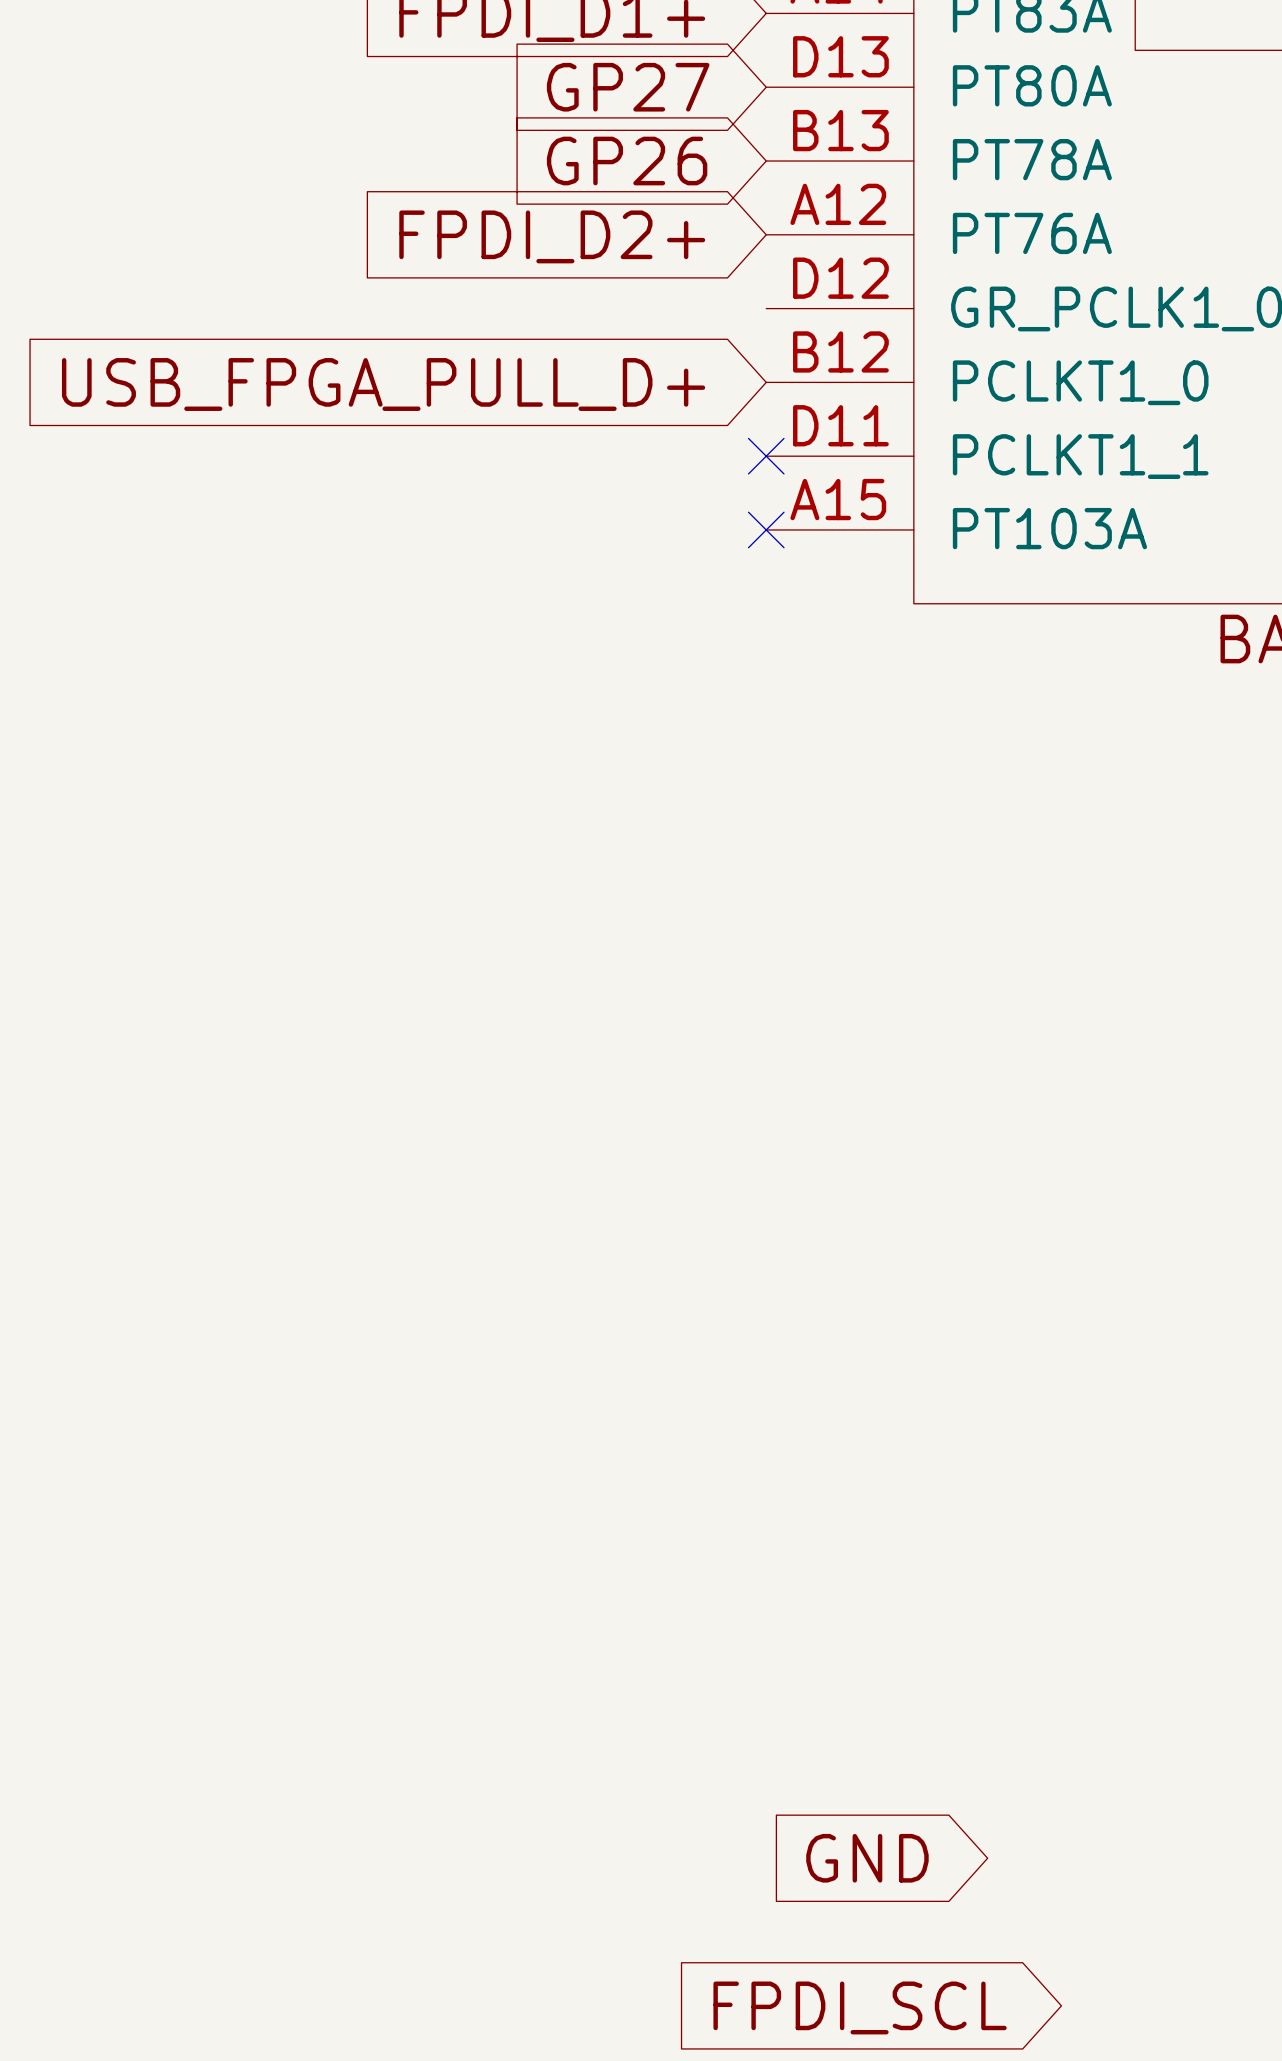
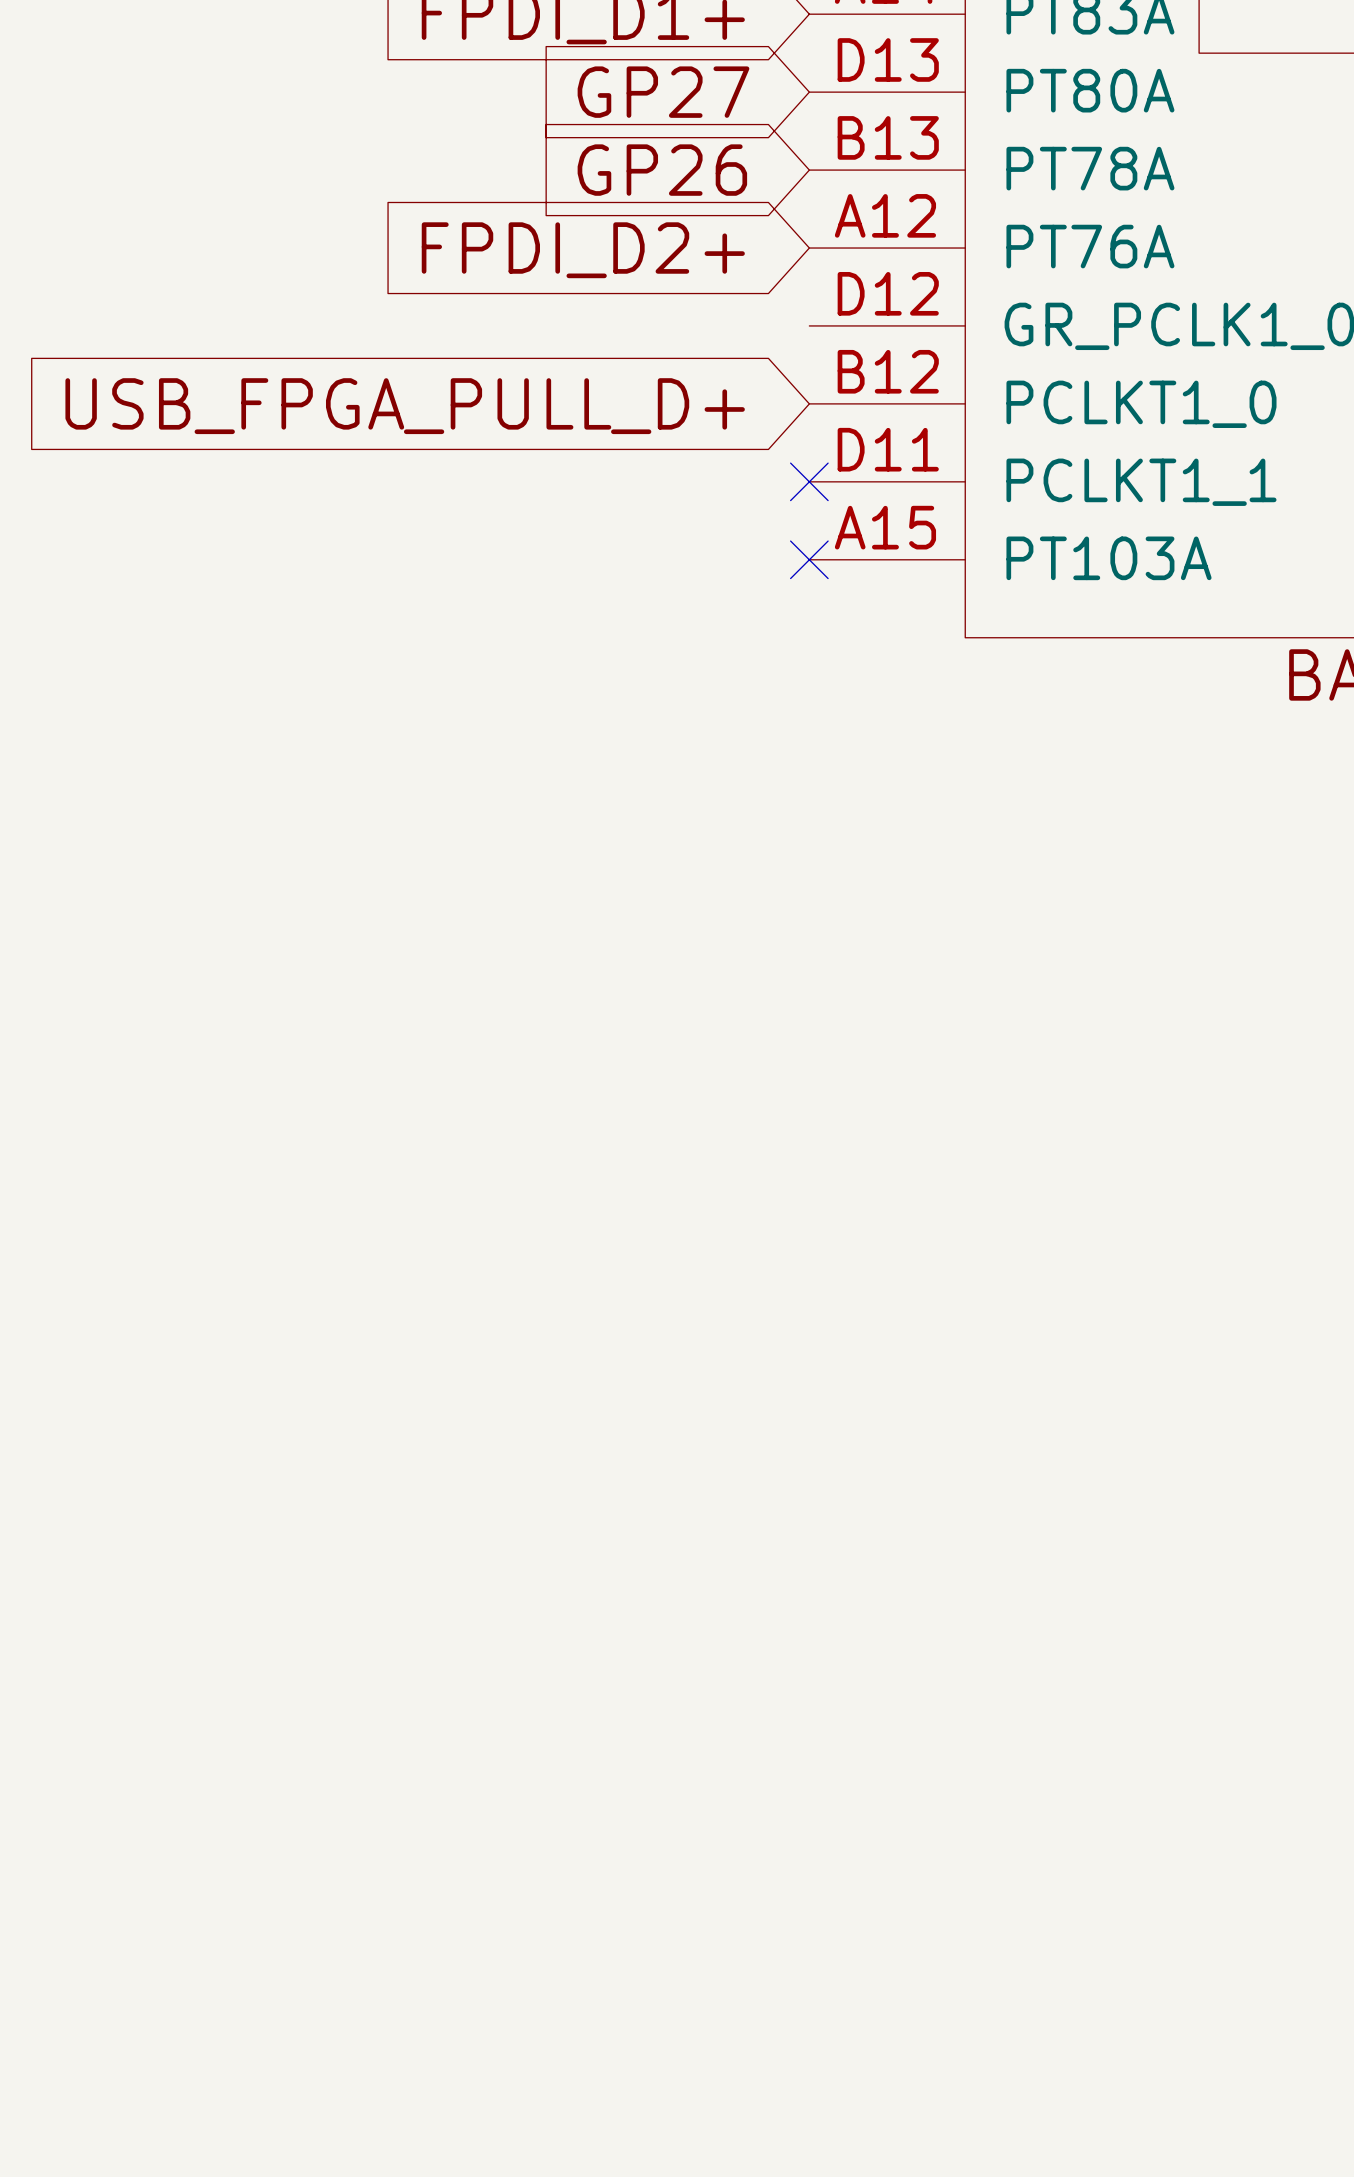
global label: GND (867, 1858) -> none
global label: FPDI_SCL (860, 2007) -> none

